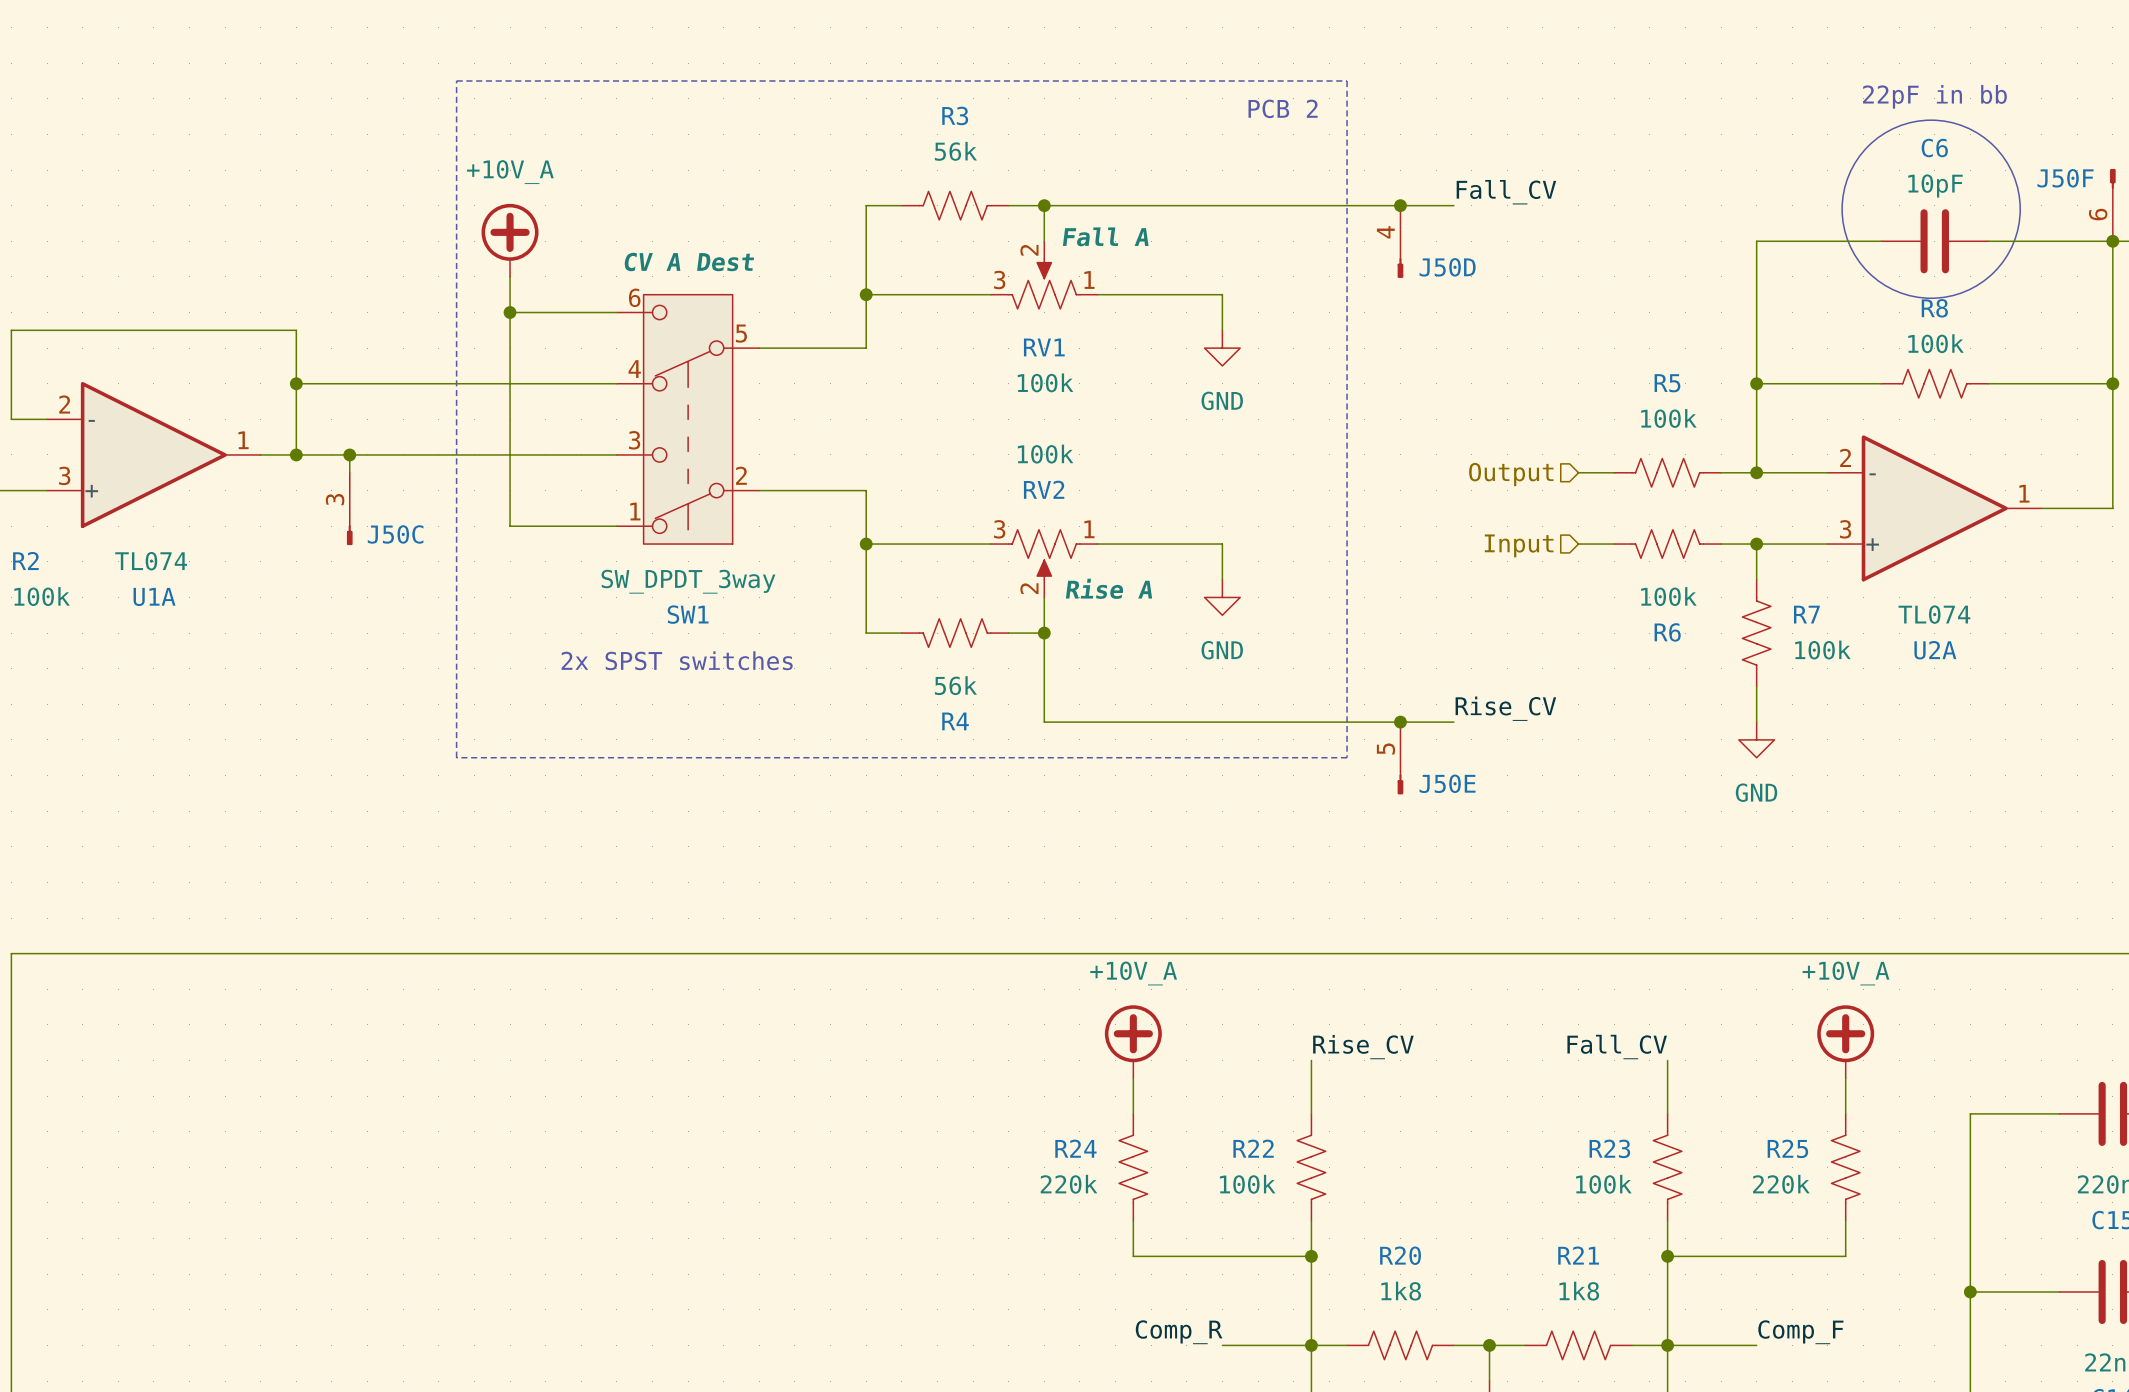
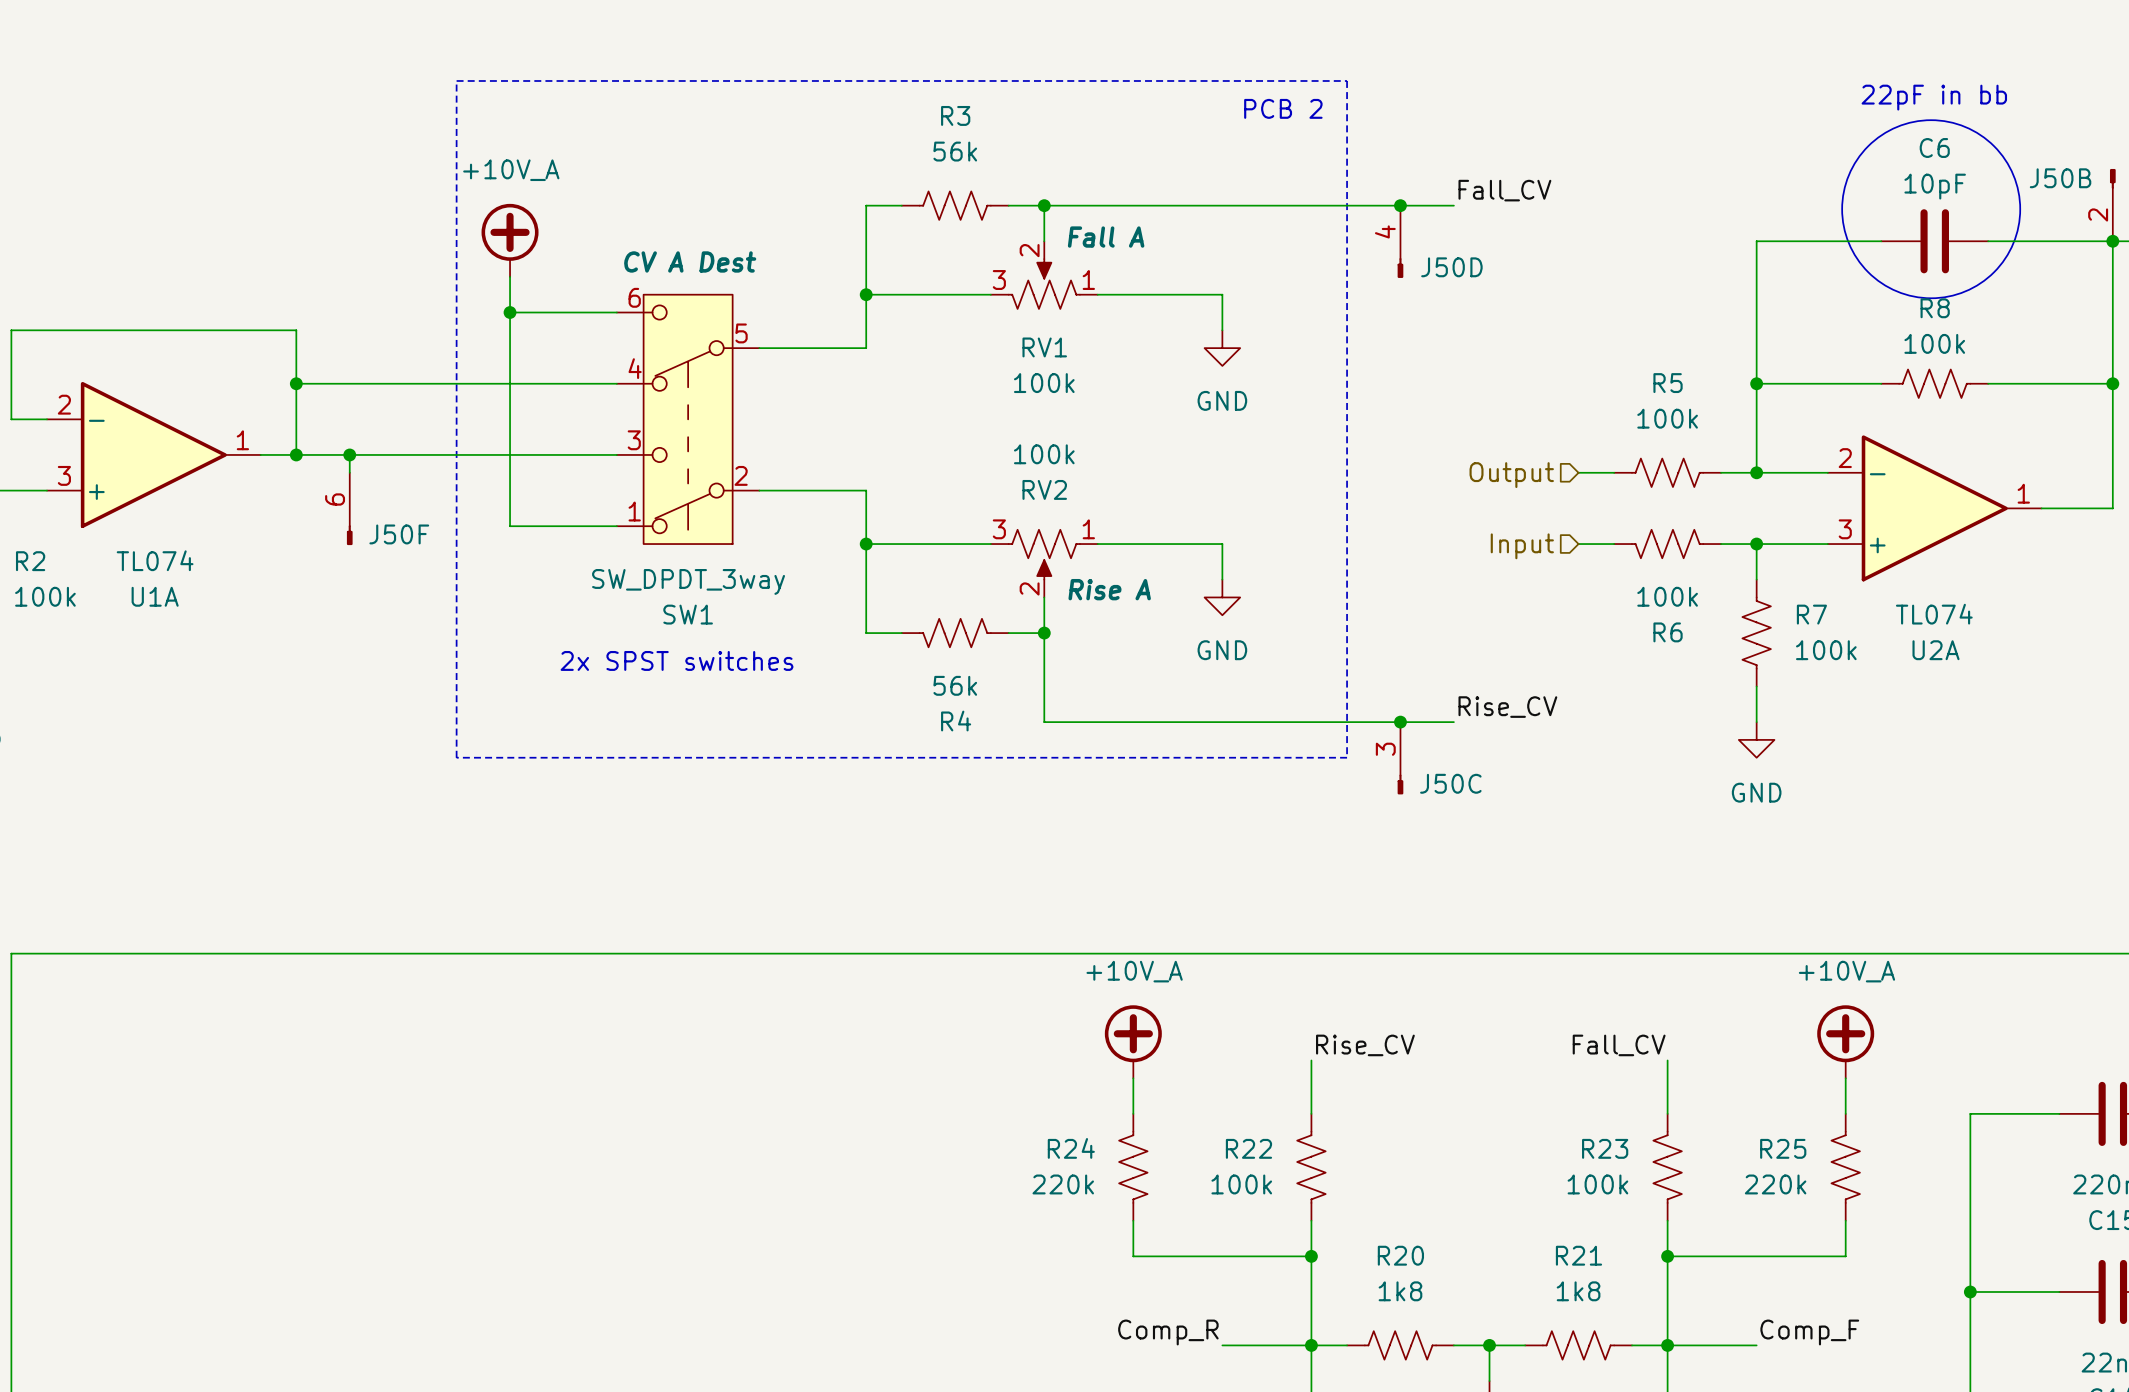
J50F rotation: 0° (2112, 178) -> 180° (349, 535)
J50F position: (2112, 205) -> (349, 508)
J50B: none -> (2112, 205)
J50C position: (349, 508) -> (1400, 758)
J50E: (1400, 758) -> none

